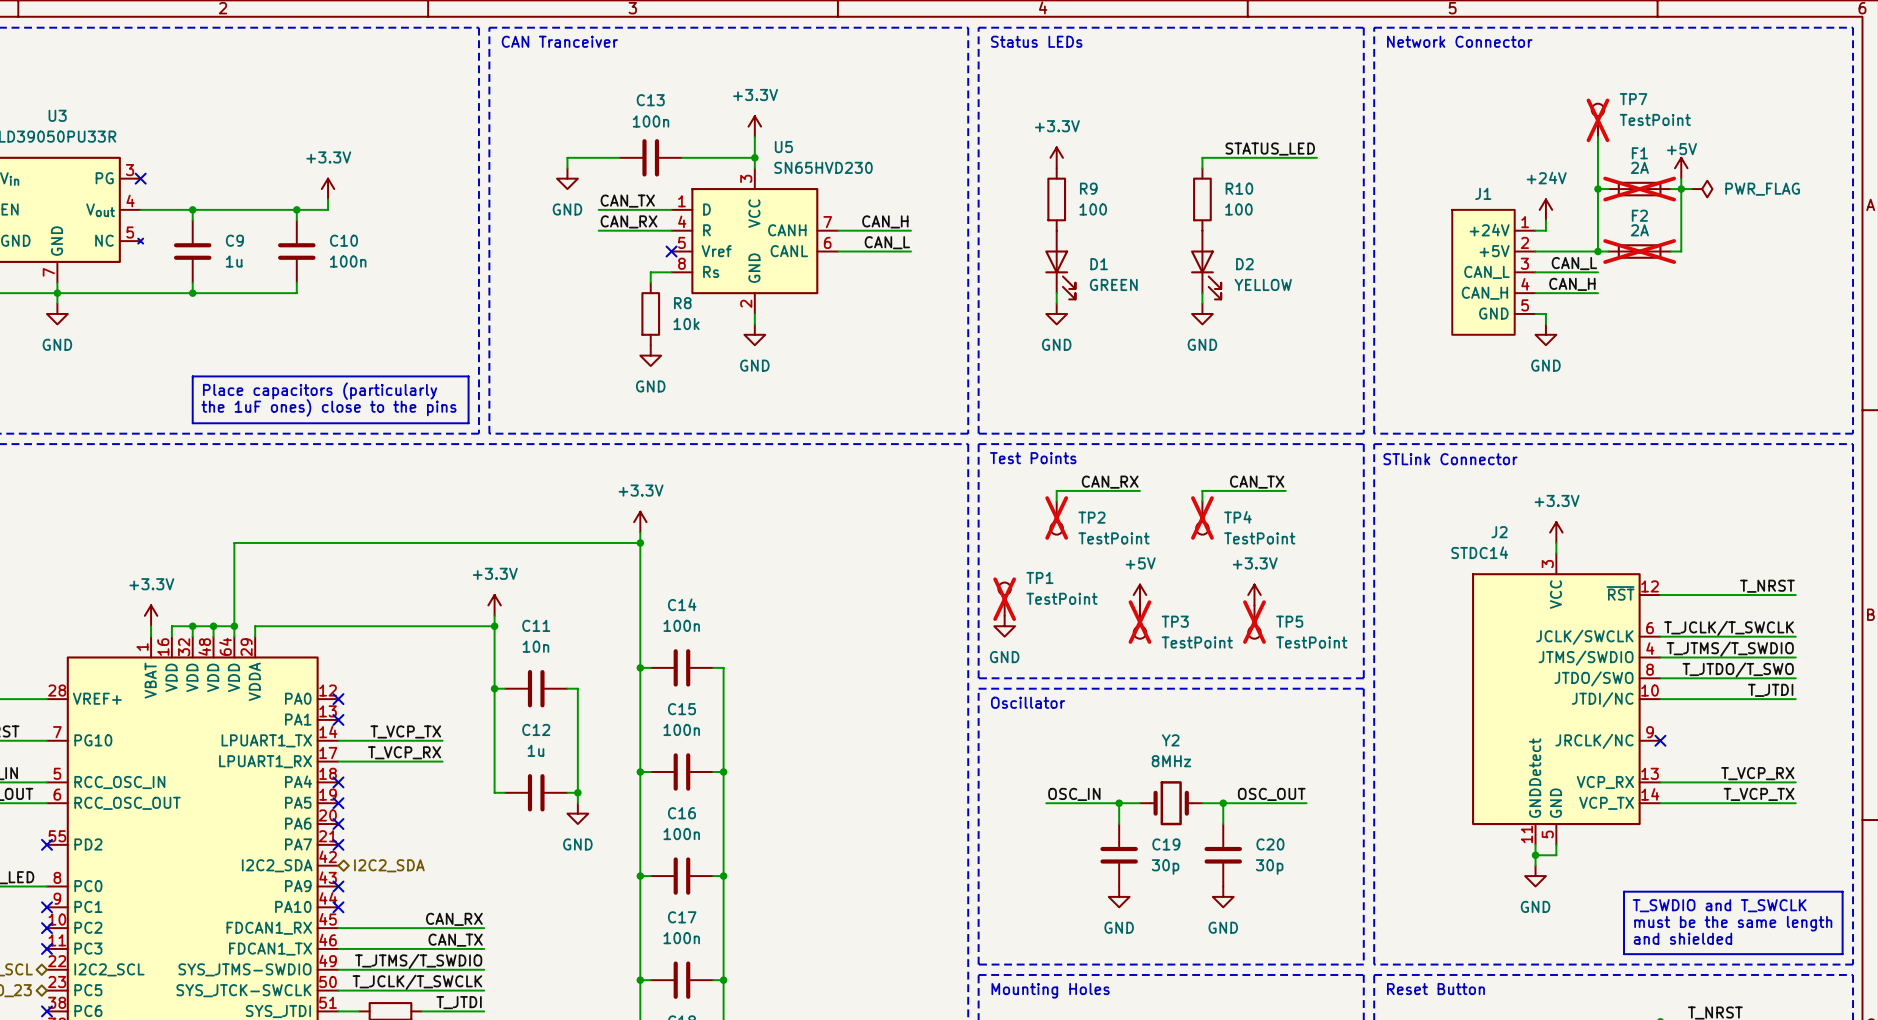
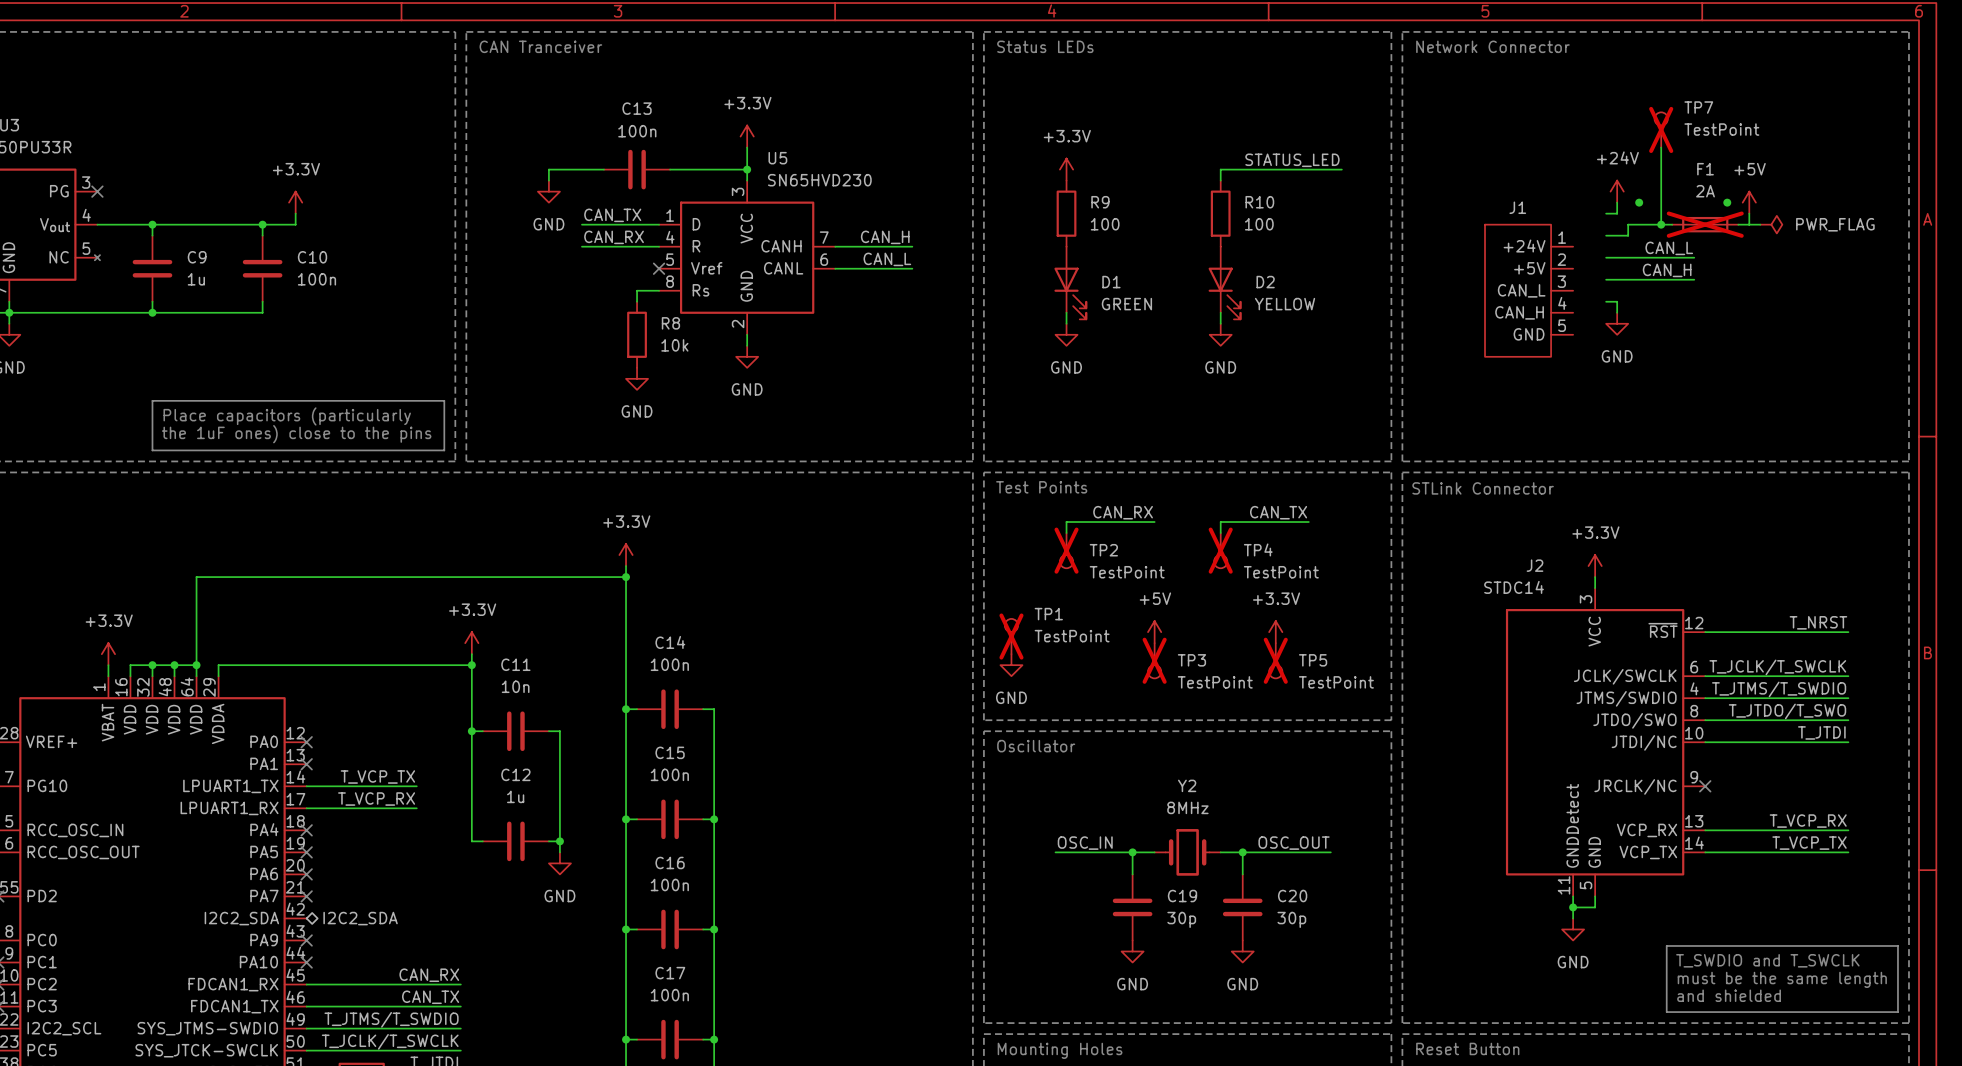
TP7 position: (1597, 120) -> (1661, 129)
wire: (1597, 137) (1597, 251) -> none
wire: none -> (1661, 147) (1661, 224)
F1 name position: F1 (1639, 153) -> F1 (1705, 169)
F1 value position: 2A (1639, 167) -> 2A (1705, 191)
power symbol: +5V (1681, 168) -> none
wire: (1681, 178) (1681, 251) (1670, 251) -> none
wire: (1597, 189) (1608, 189) -> none
F1 position: (1639, 189) -> (1705, 224)
wire: (1670, 189) (1691, 189) -> (1738, 224) (1760, 224)
power symbol: PWR_FLAG (1702, 189) -> +5V (1749, 202)
wire: none -> (1749, 213) (1749, 224)
power symbol position: +24V (1545, 209) -> +24V (1617, 191)
wire: none -> (1672, 224) (1628, 224) (1628, 235) (1606, 235)
power symbol: none -> PWR_FLAG (1771, 224)
wire: (1545, 220) (1545, 230) (1535, 230) -> (1617, 202) (1617, 213) (1606, 213)
wire: none -> (1606, 257) (1694, 257)
wire: (1535, 251) (1608, 251) -> none
junction position: (1597, 251) -> (1661, 224)
F2: 2A (1639, 251) -> none
wire: none -> (1606, 279) (1694, 279)
label position: CAN_L (1574, 263) -> CAN_L (1669, 248)
wire: (1535, 272) (1597, 272) -> none
label position: CAN_H (1572, 284) -> CAN_H (1667, 270)
wire: (1535, 293) (1597, 293) -> none
wire: (1535, 313) (1545, 313) (1545, 324) -> (1606, 301) (1617, 301) (1617, 312)
power symbol position: GND (1545, 334) -> GND (1617, 323)

